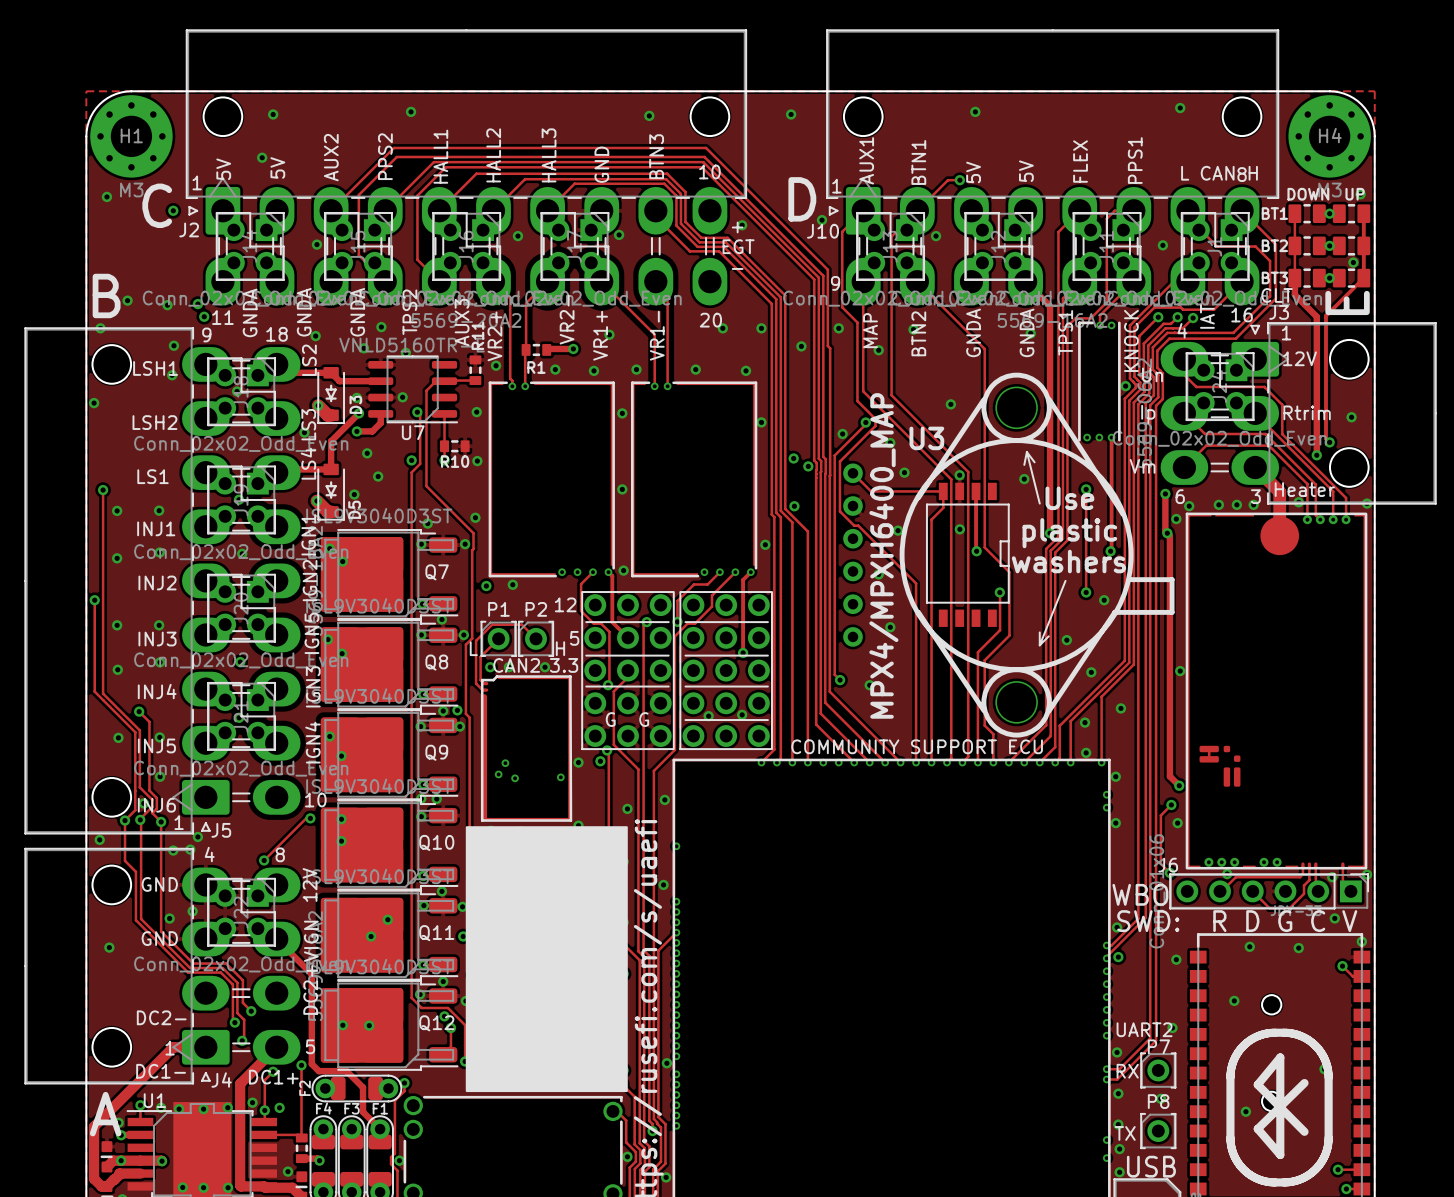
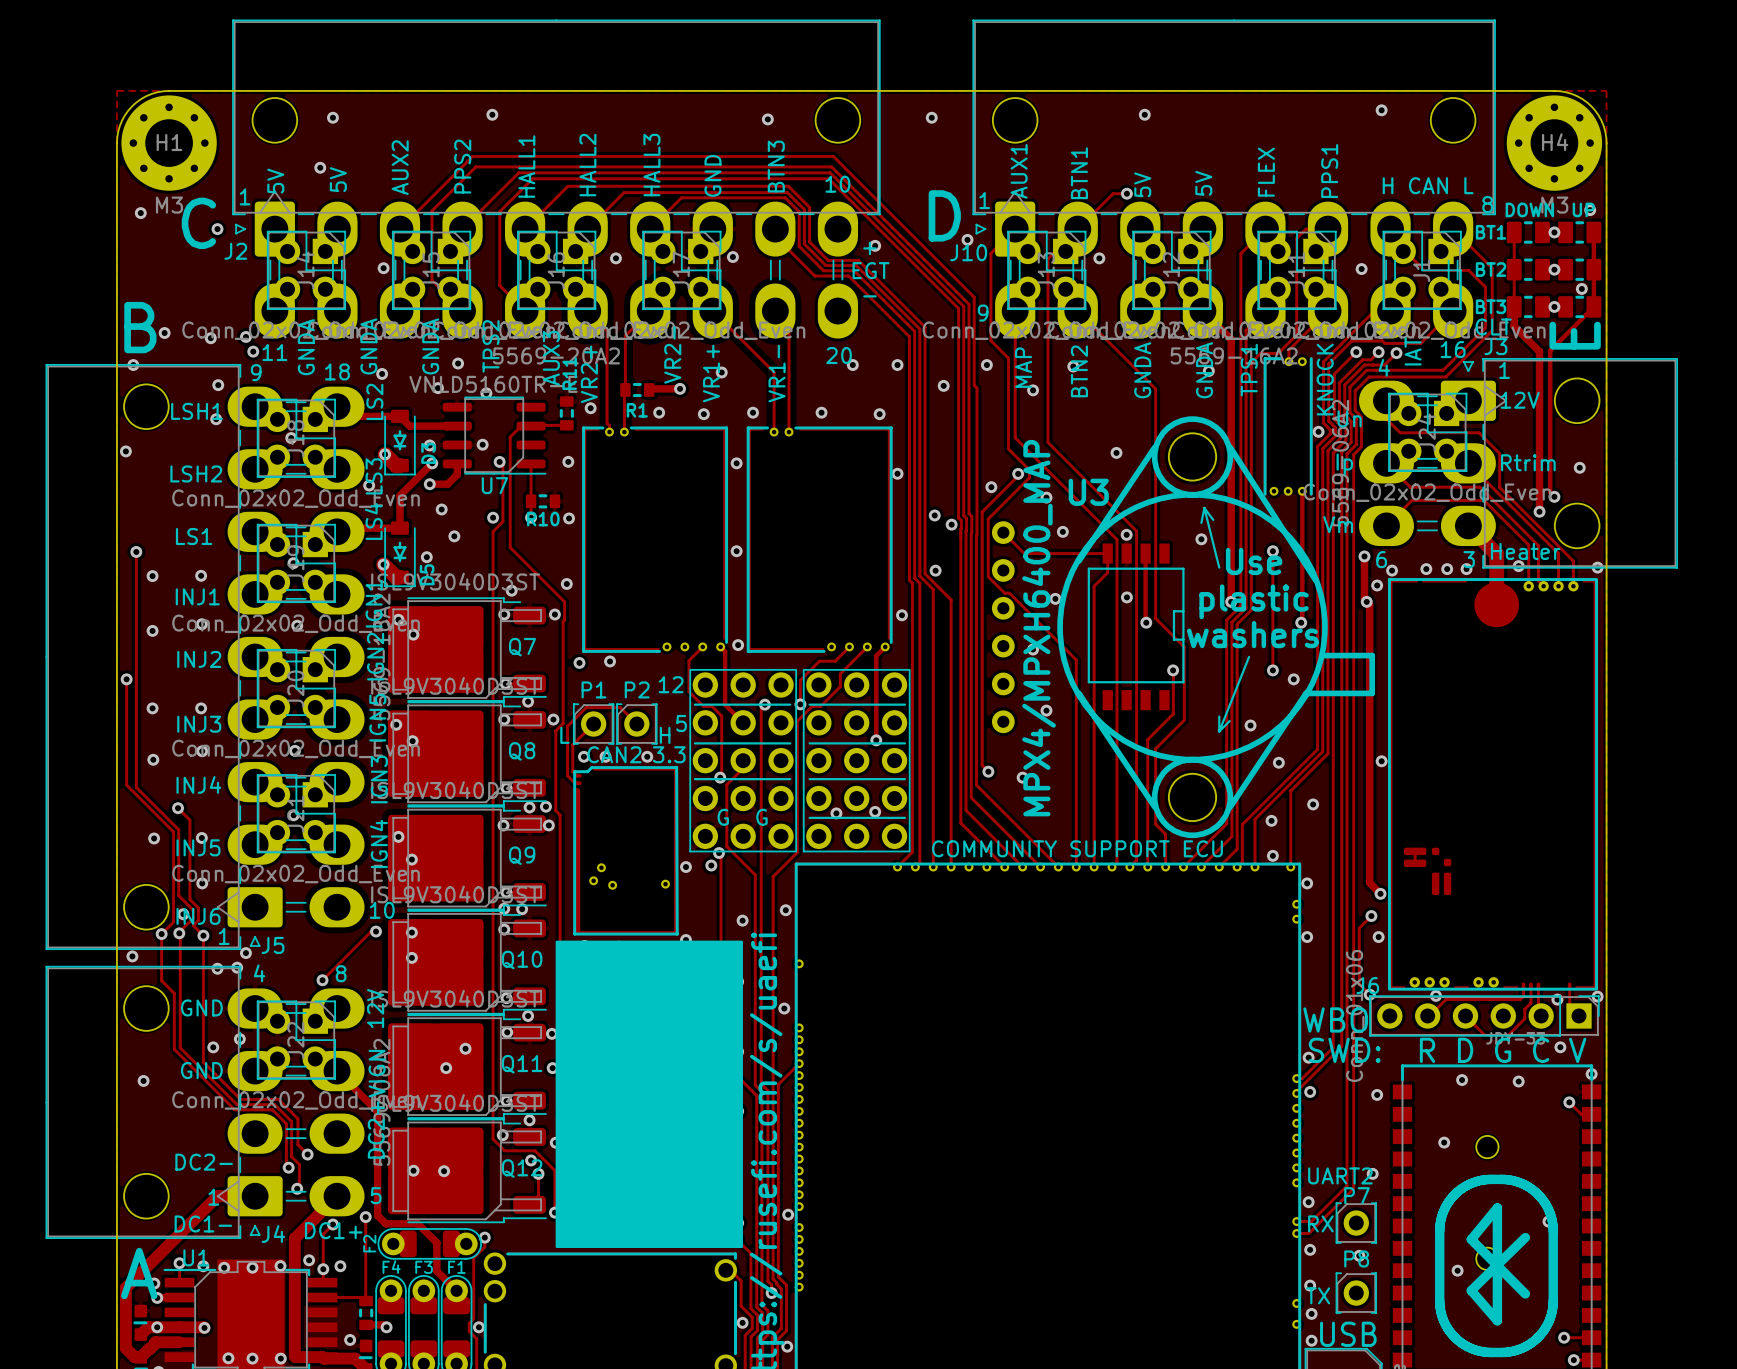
text: L CAN H (1219, 173) -> H CAN L (1428, 185)
text position: 8 (1242, 174) -> 8 (1487, 204)

